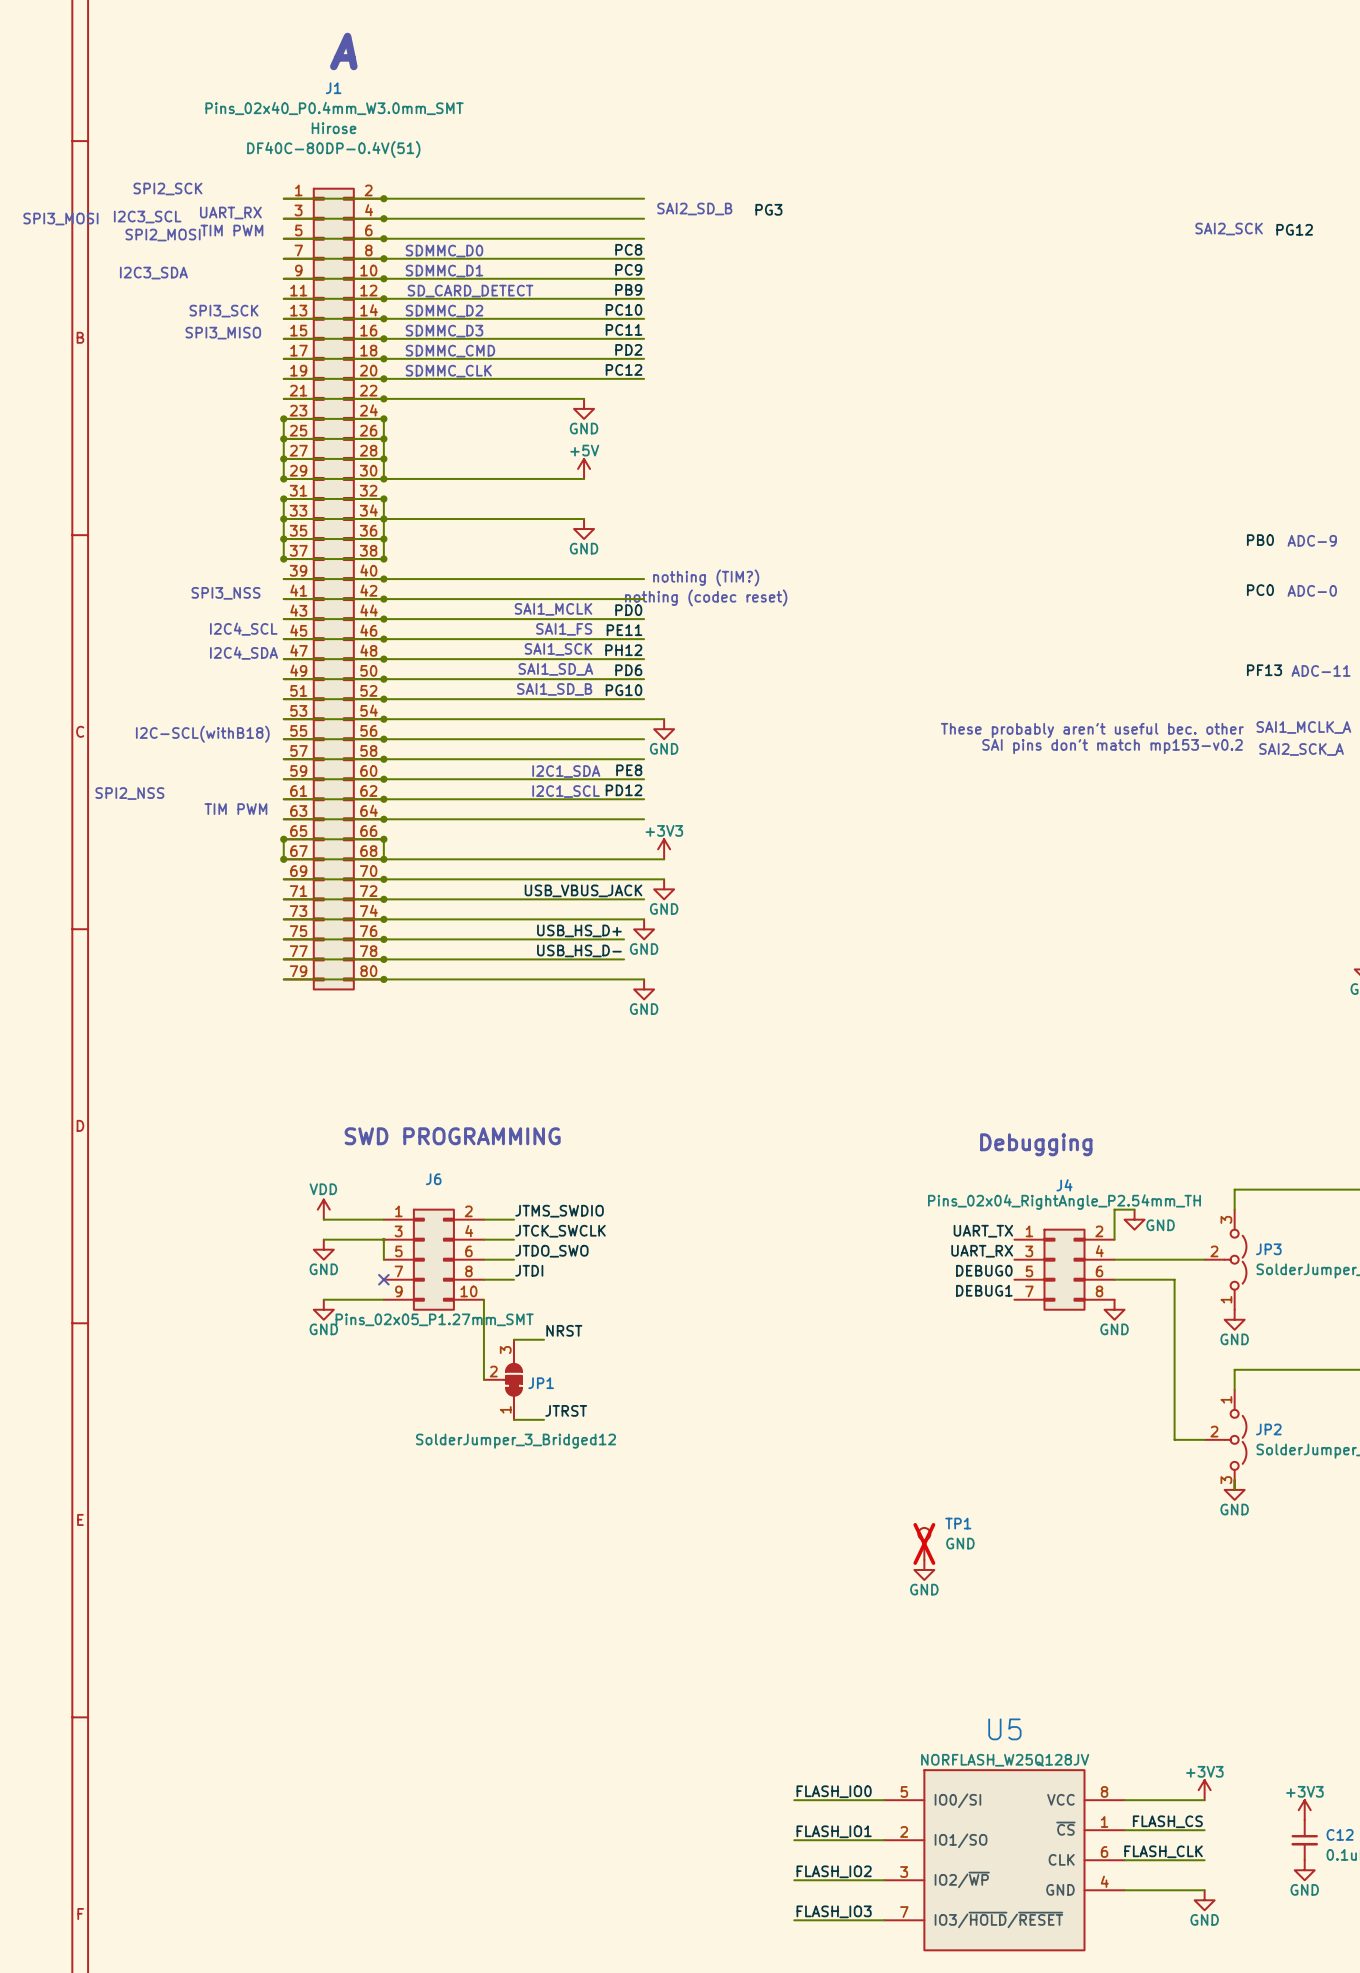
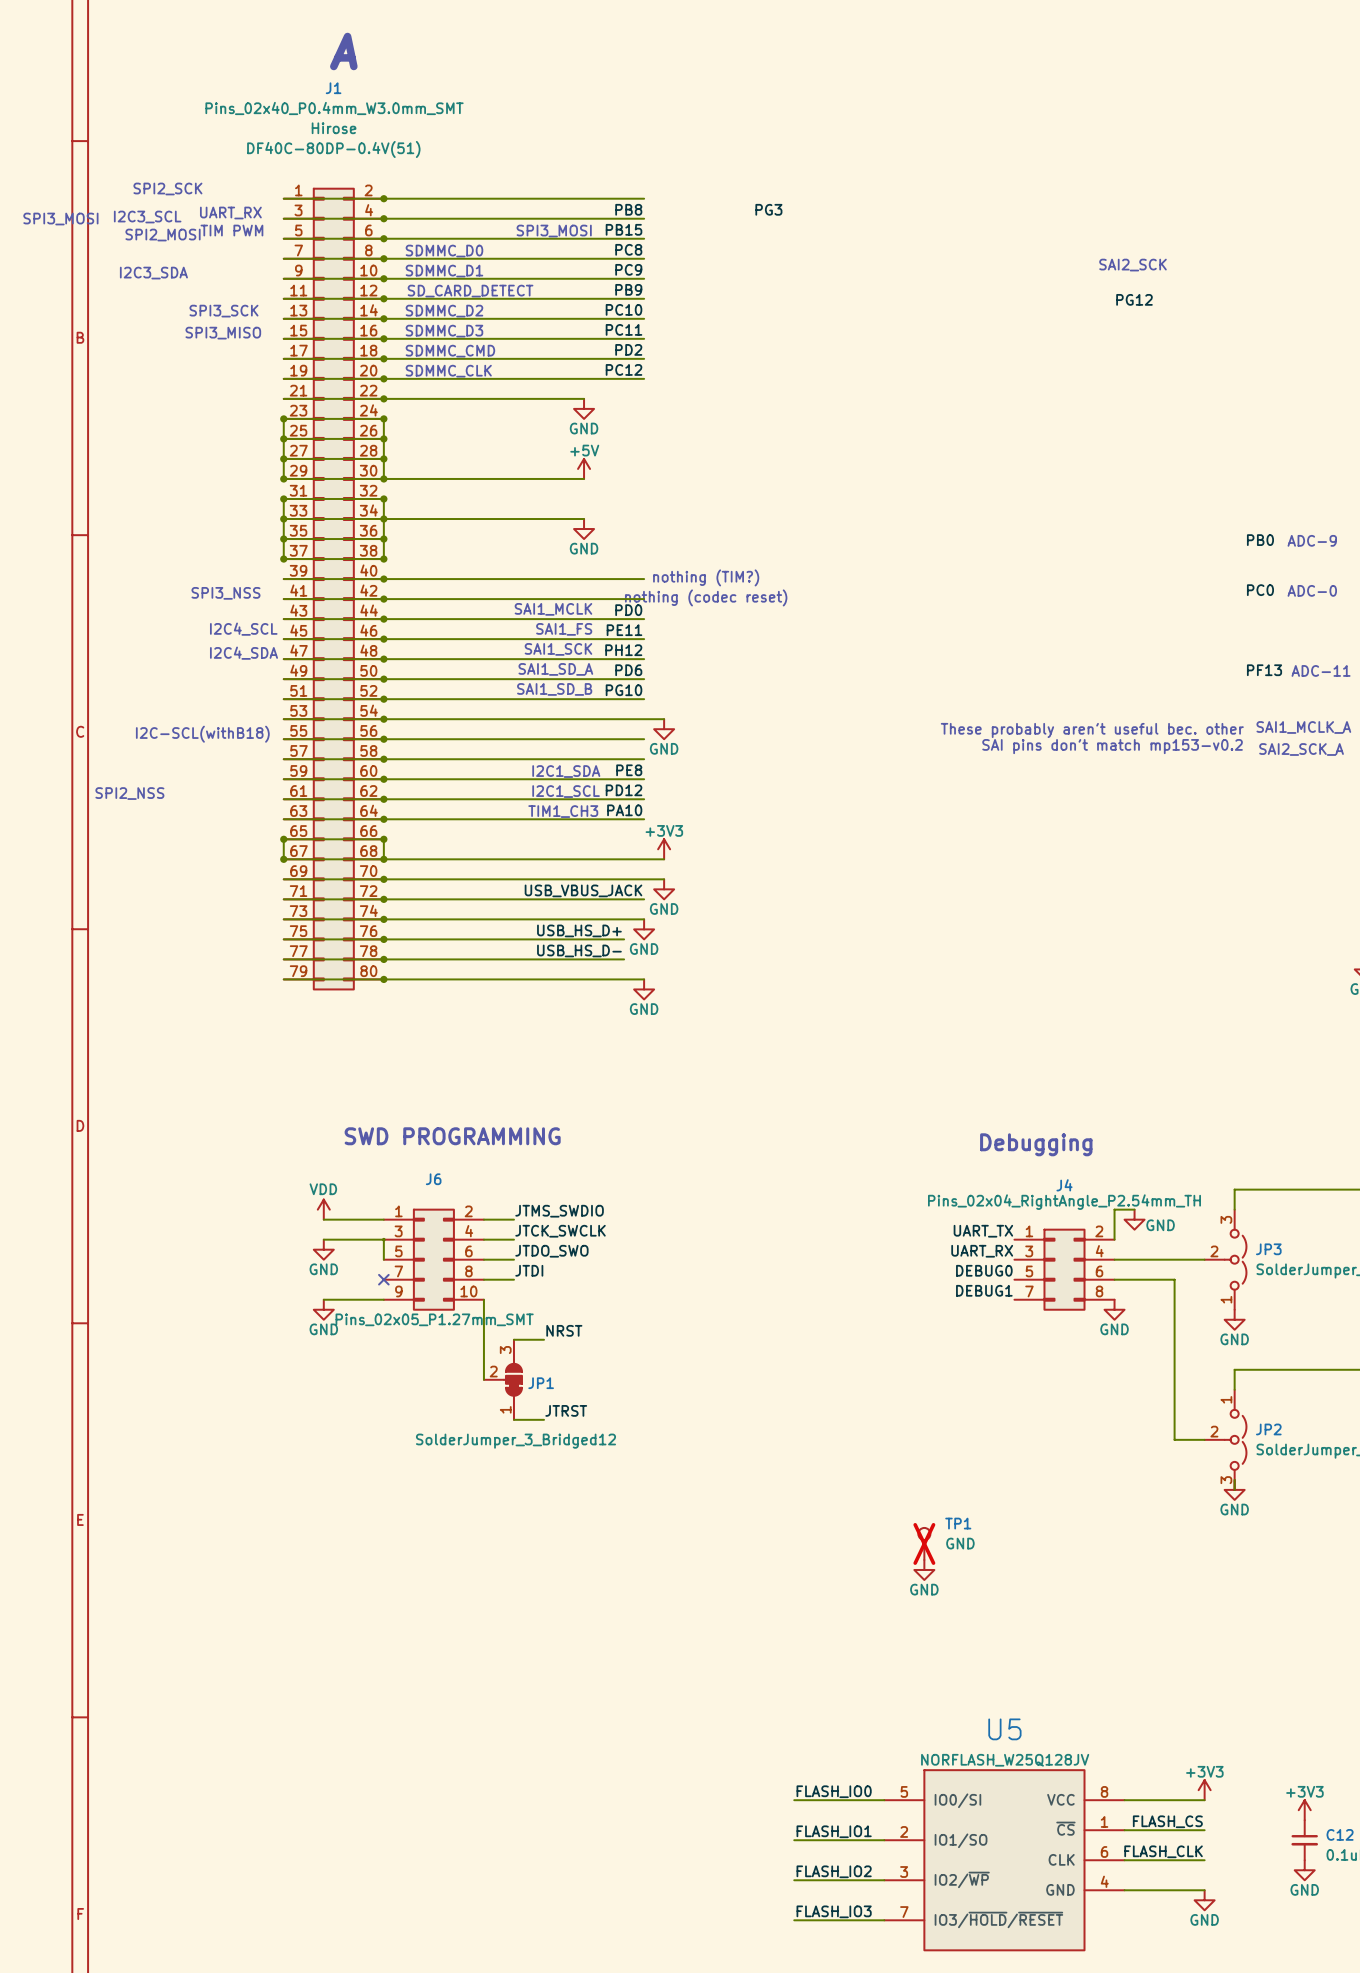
label: none -> PB8 (628, 209)
text: SAI2_SD_B (694, 209) -> none
label: none -> PB15 (624, 229)
text position: SAI2_SCK (1229, 229) -> SAI2_SCK (1133, 265)
label position: PG12 (1294, 229) -> PG12 (1134, 299)
text: none -> SPI3_MOSI (554, 231)
text: TIM PWM (235, 809) -> none
label: none -> PA10 (624, 810)
text: none -> TIM1_CH3 (563, 811)

